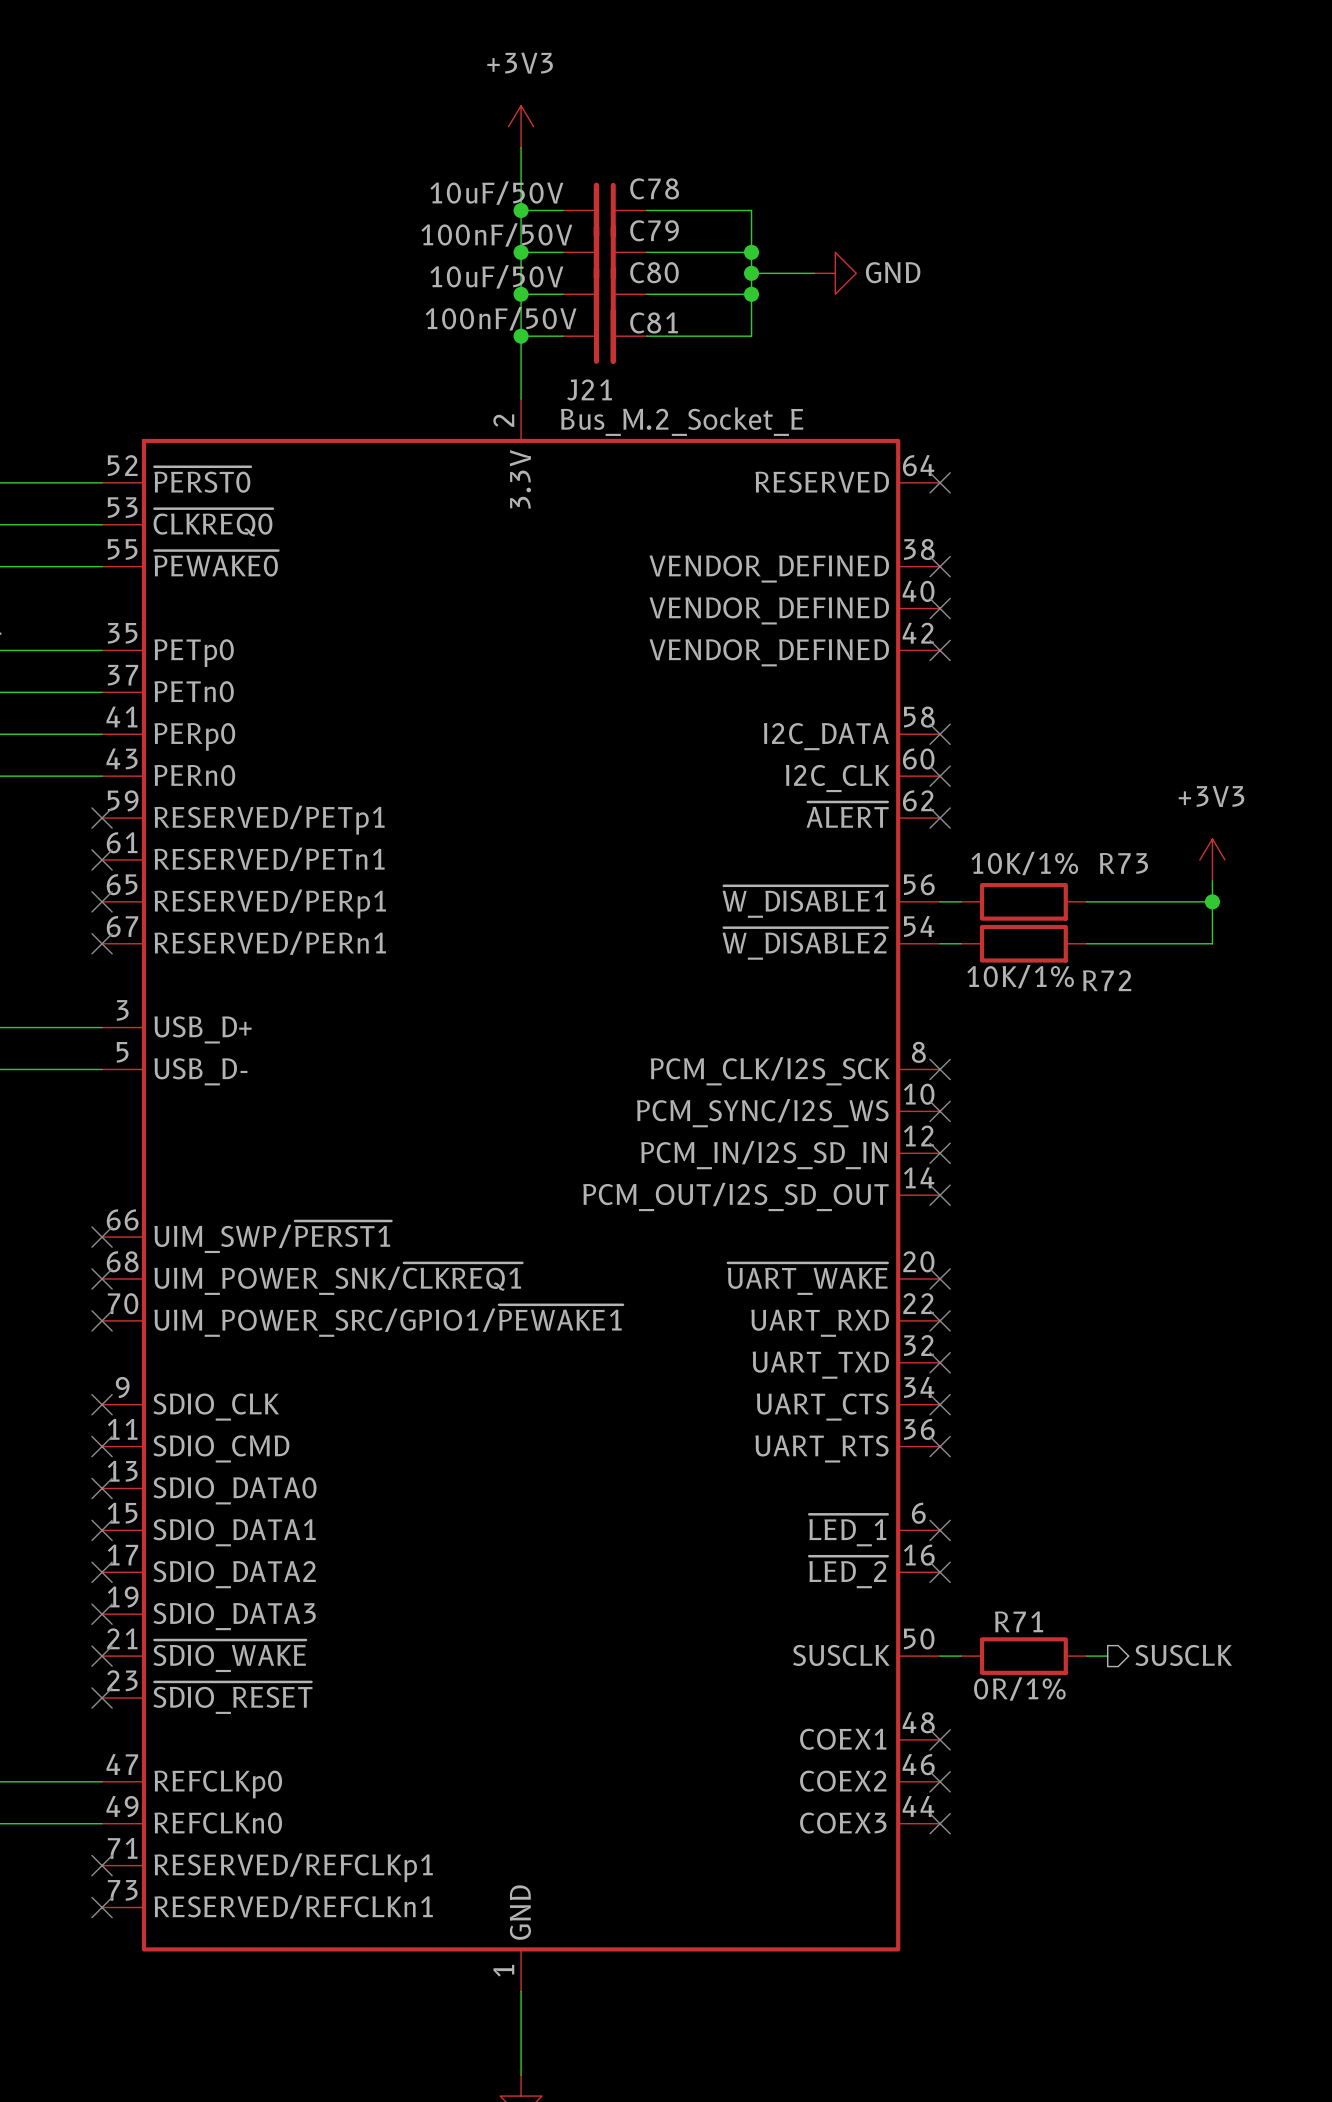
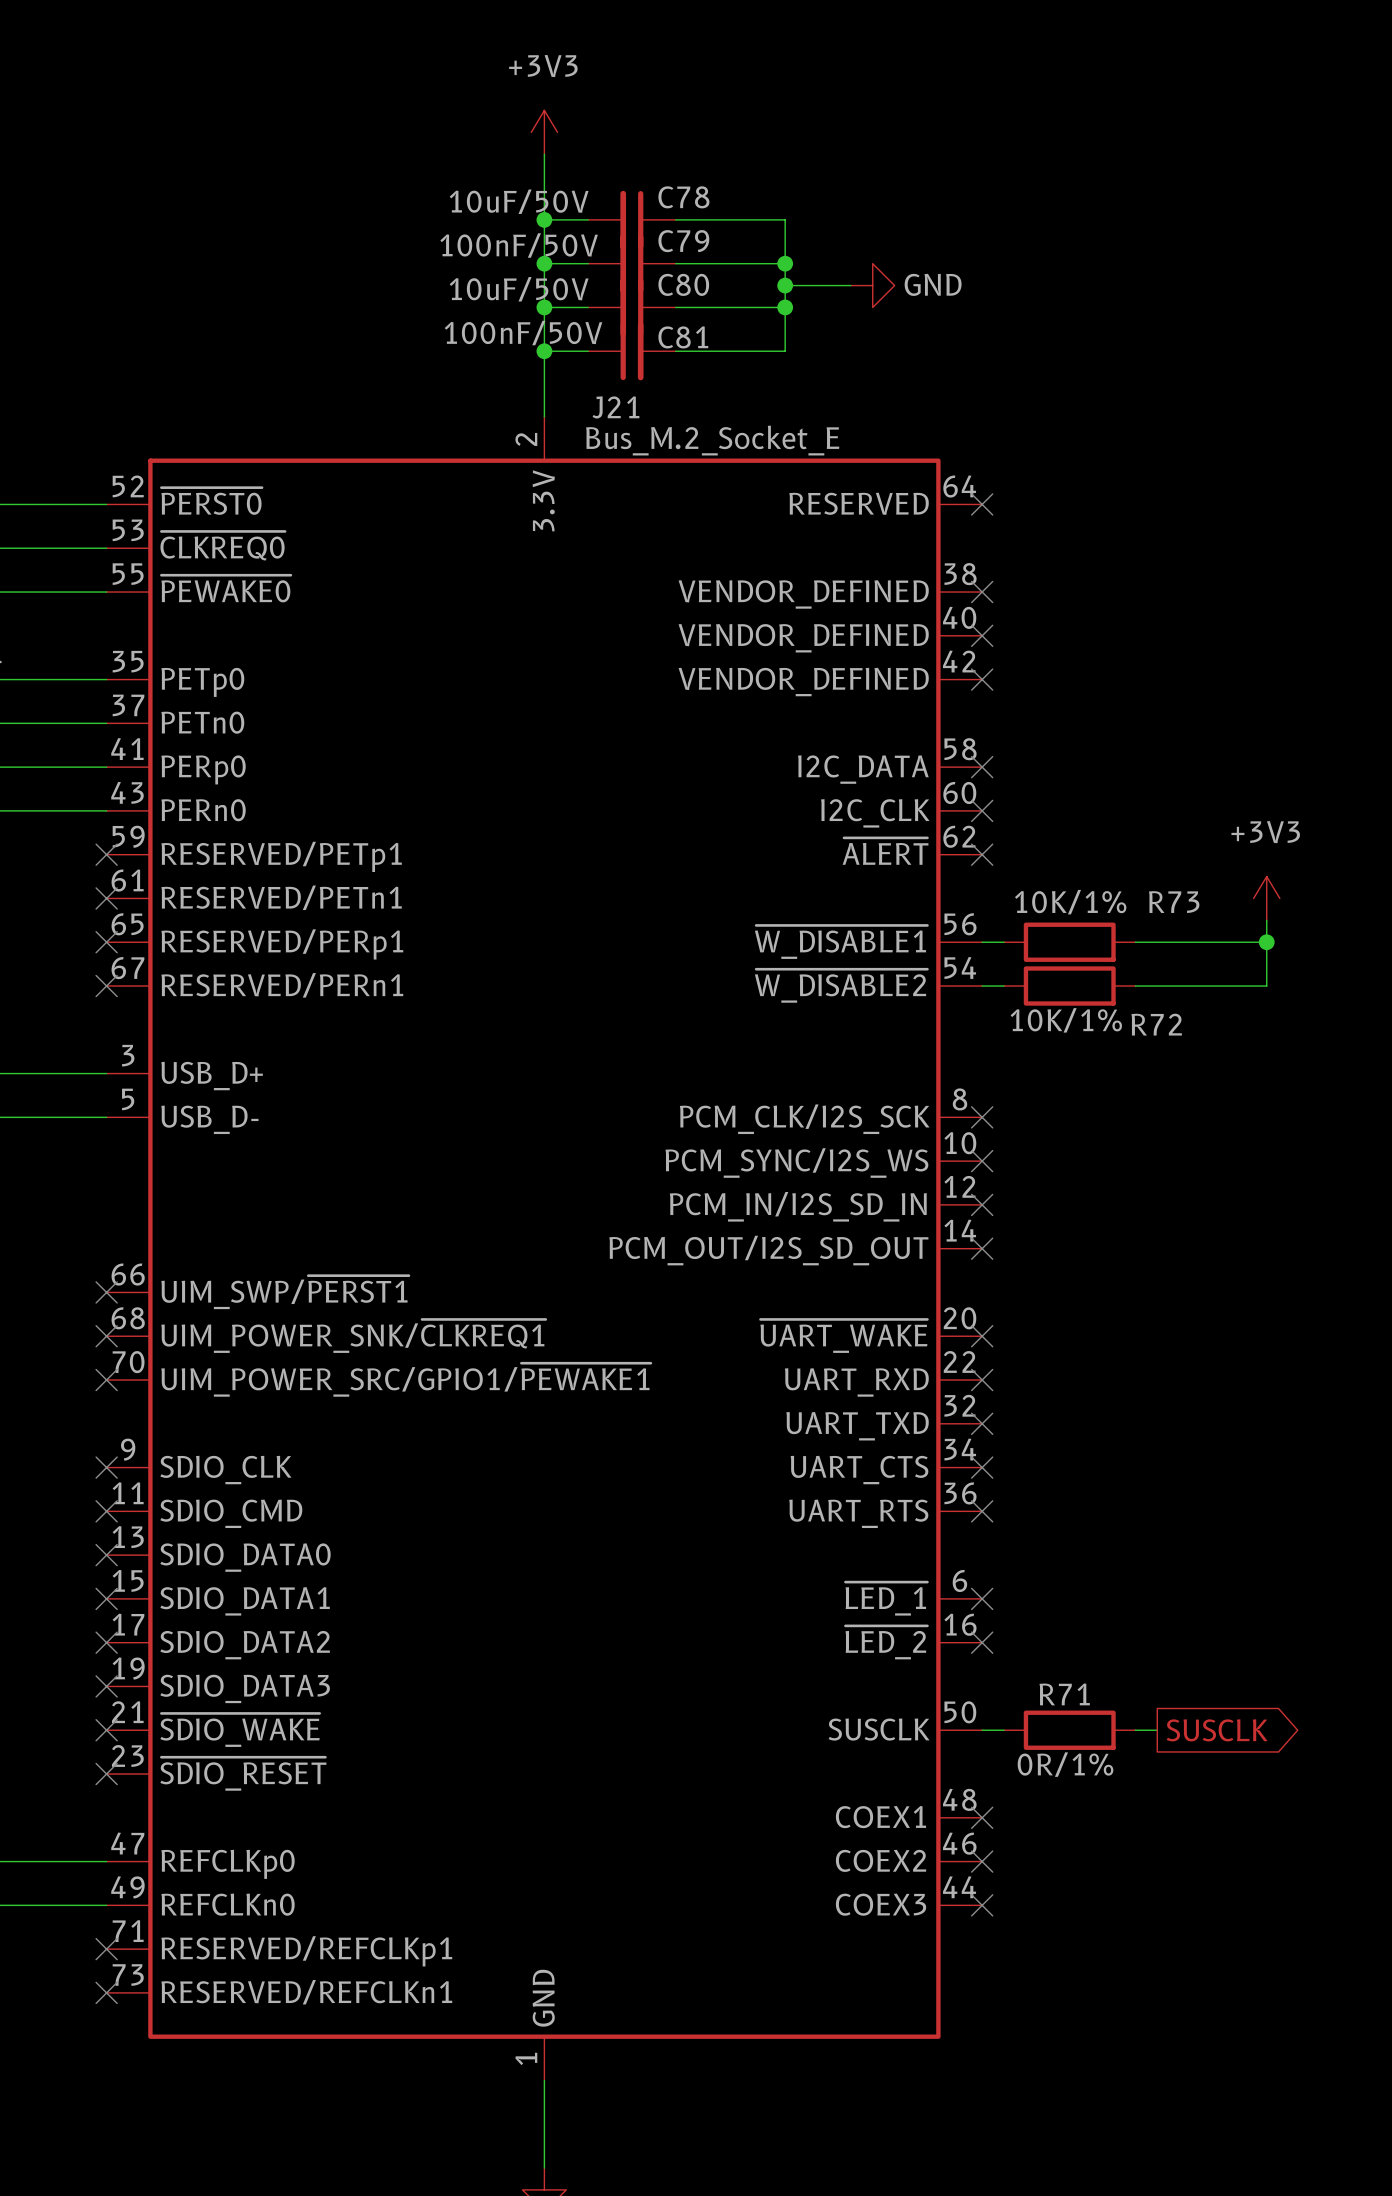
hierarchical label: SUSCLK (1183, 1655) -> none
global label: none -> SUSCLK (1217, 1730)

